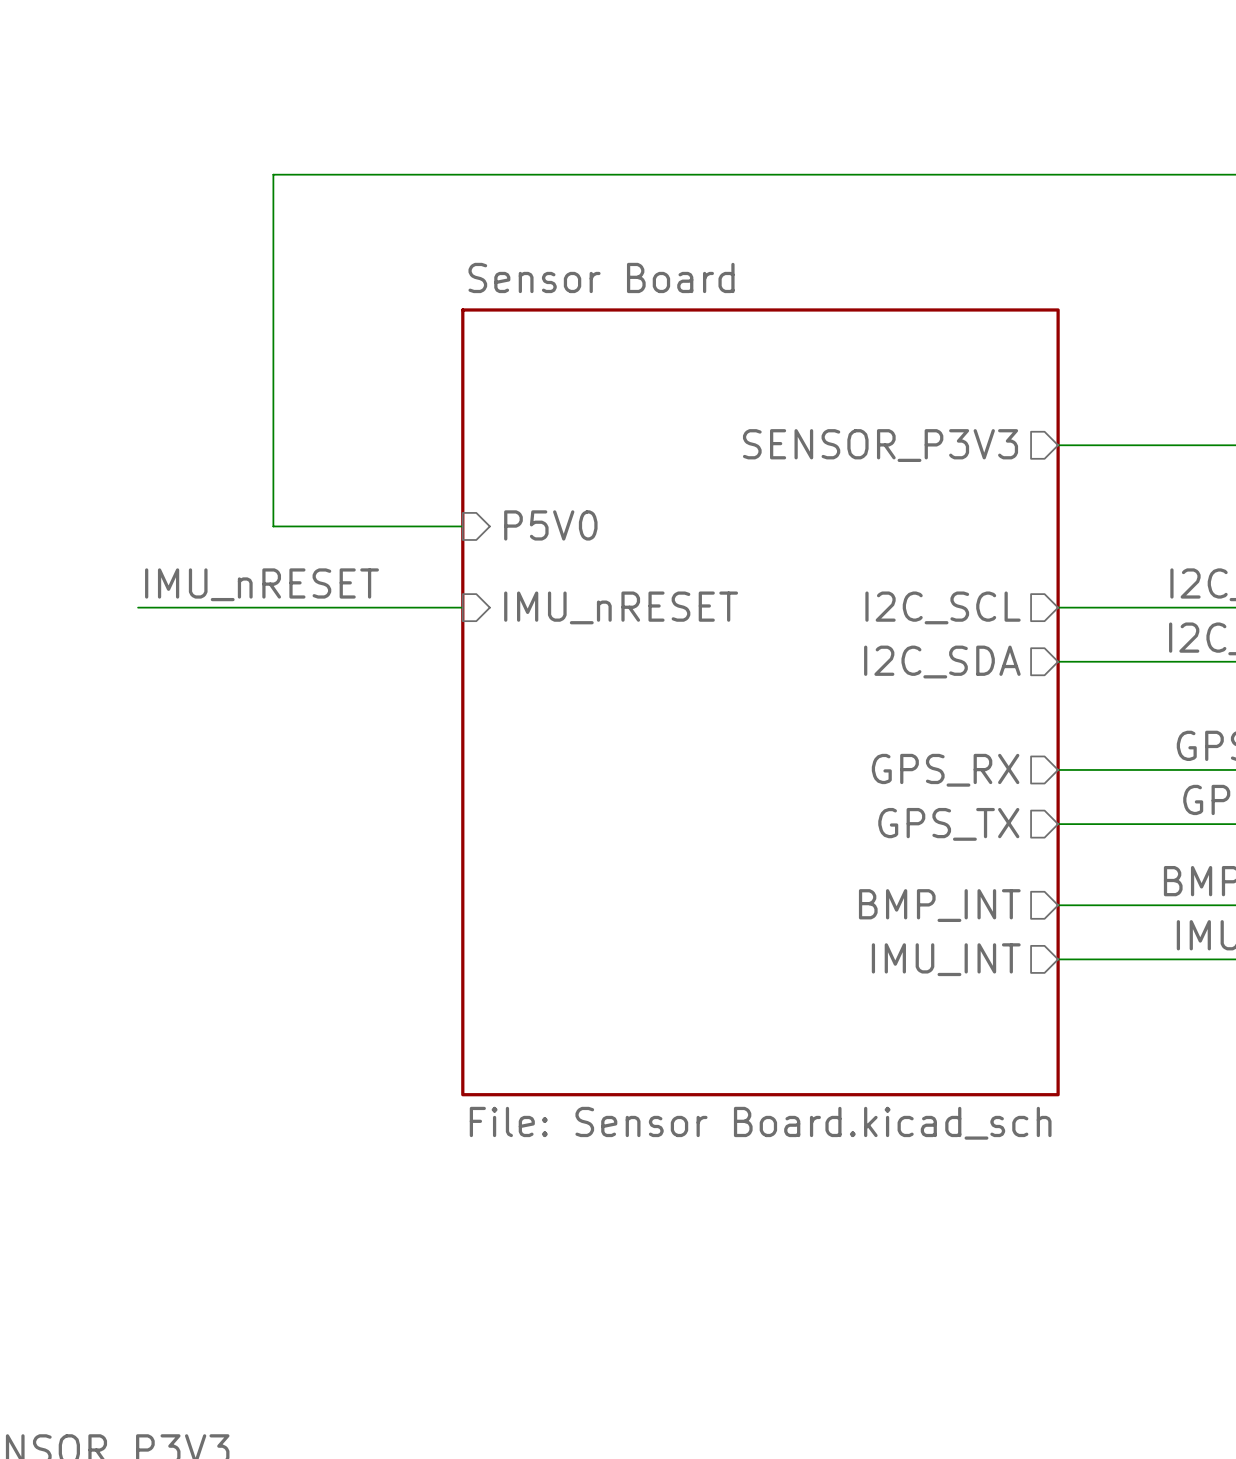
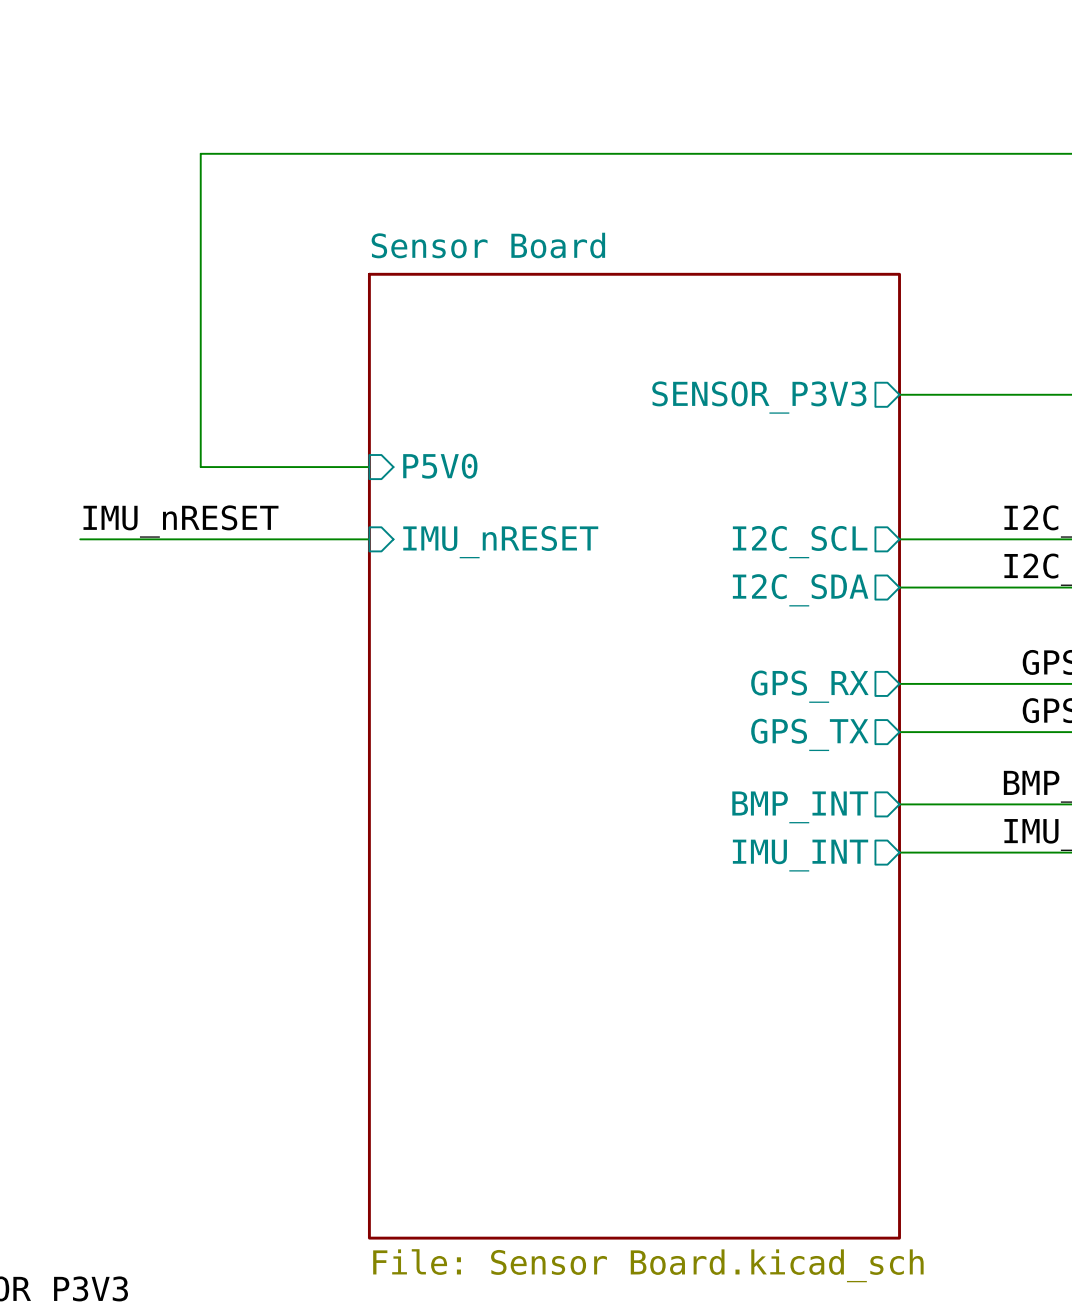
sheet Sensor Board: File: Sensor Board.kicad_sch (760, 702) -> none
sheet Sensor Board: none -> File: Sensor Board.kicad_sch (634, 756)

